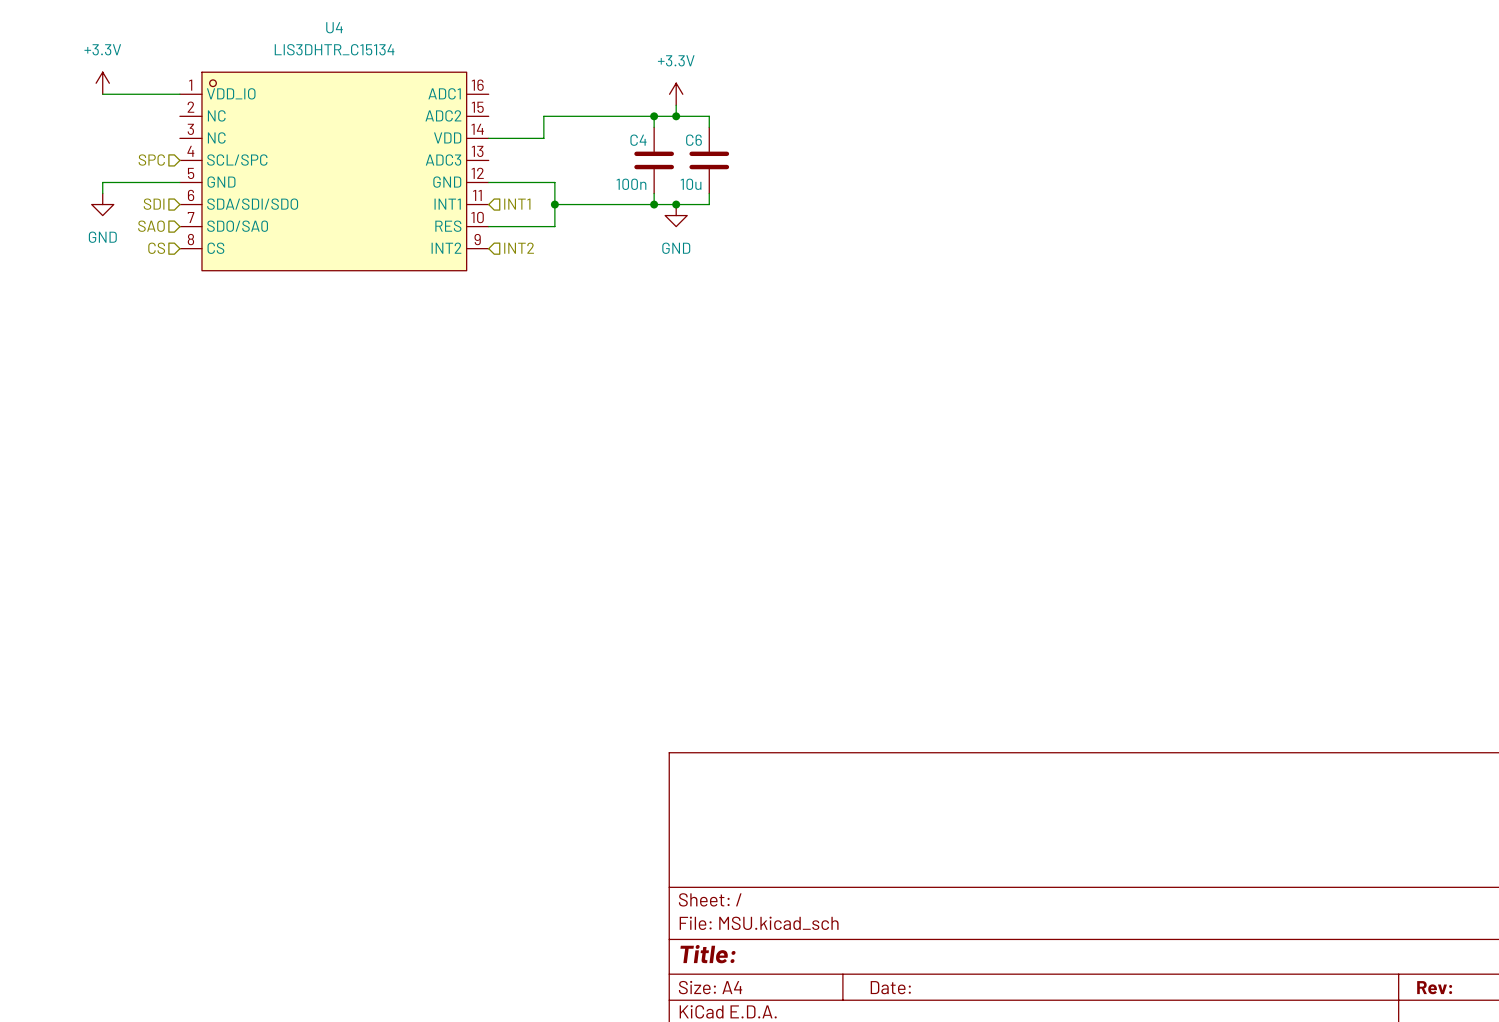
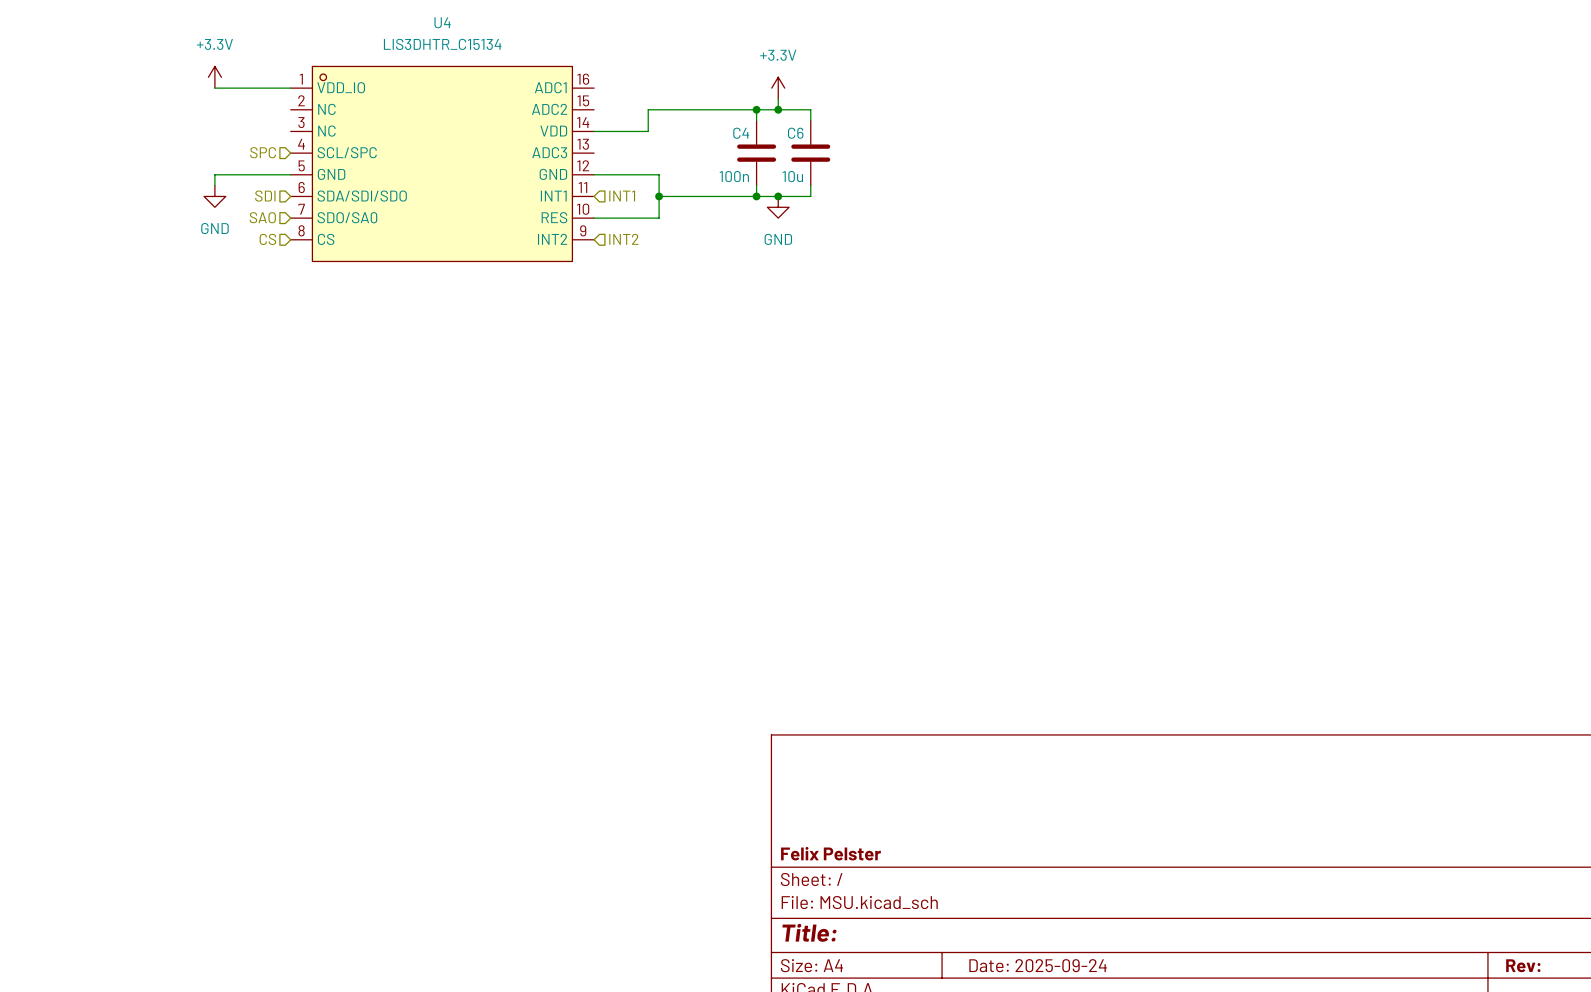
title block: none -> Felix Pelster (831, 853)
title block: Date: (890, 987) -> Date: 2025-09-24 (1038, 965)

